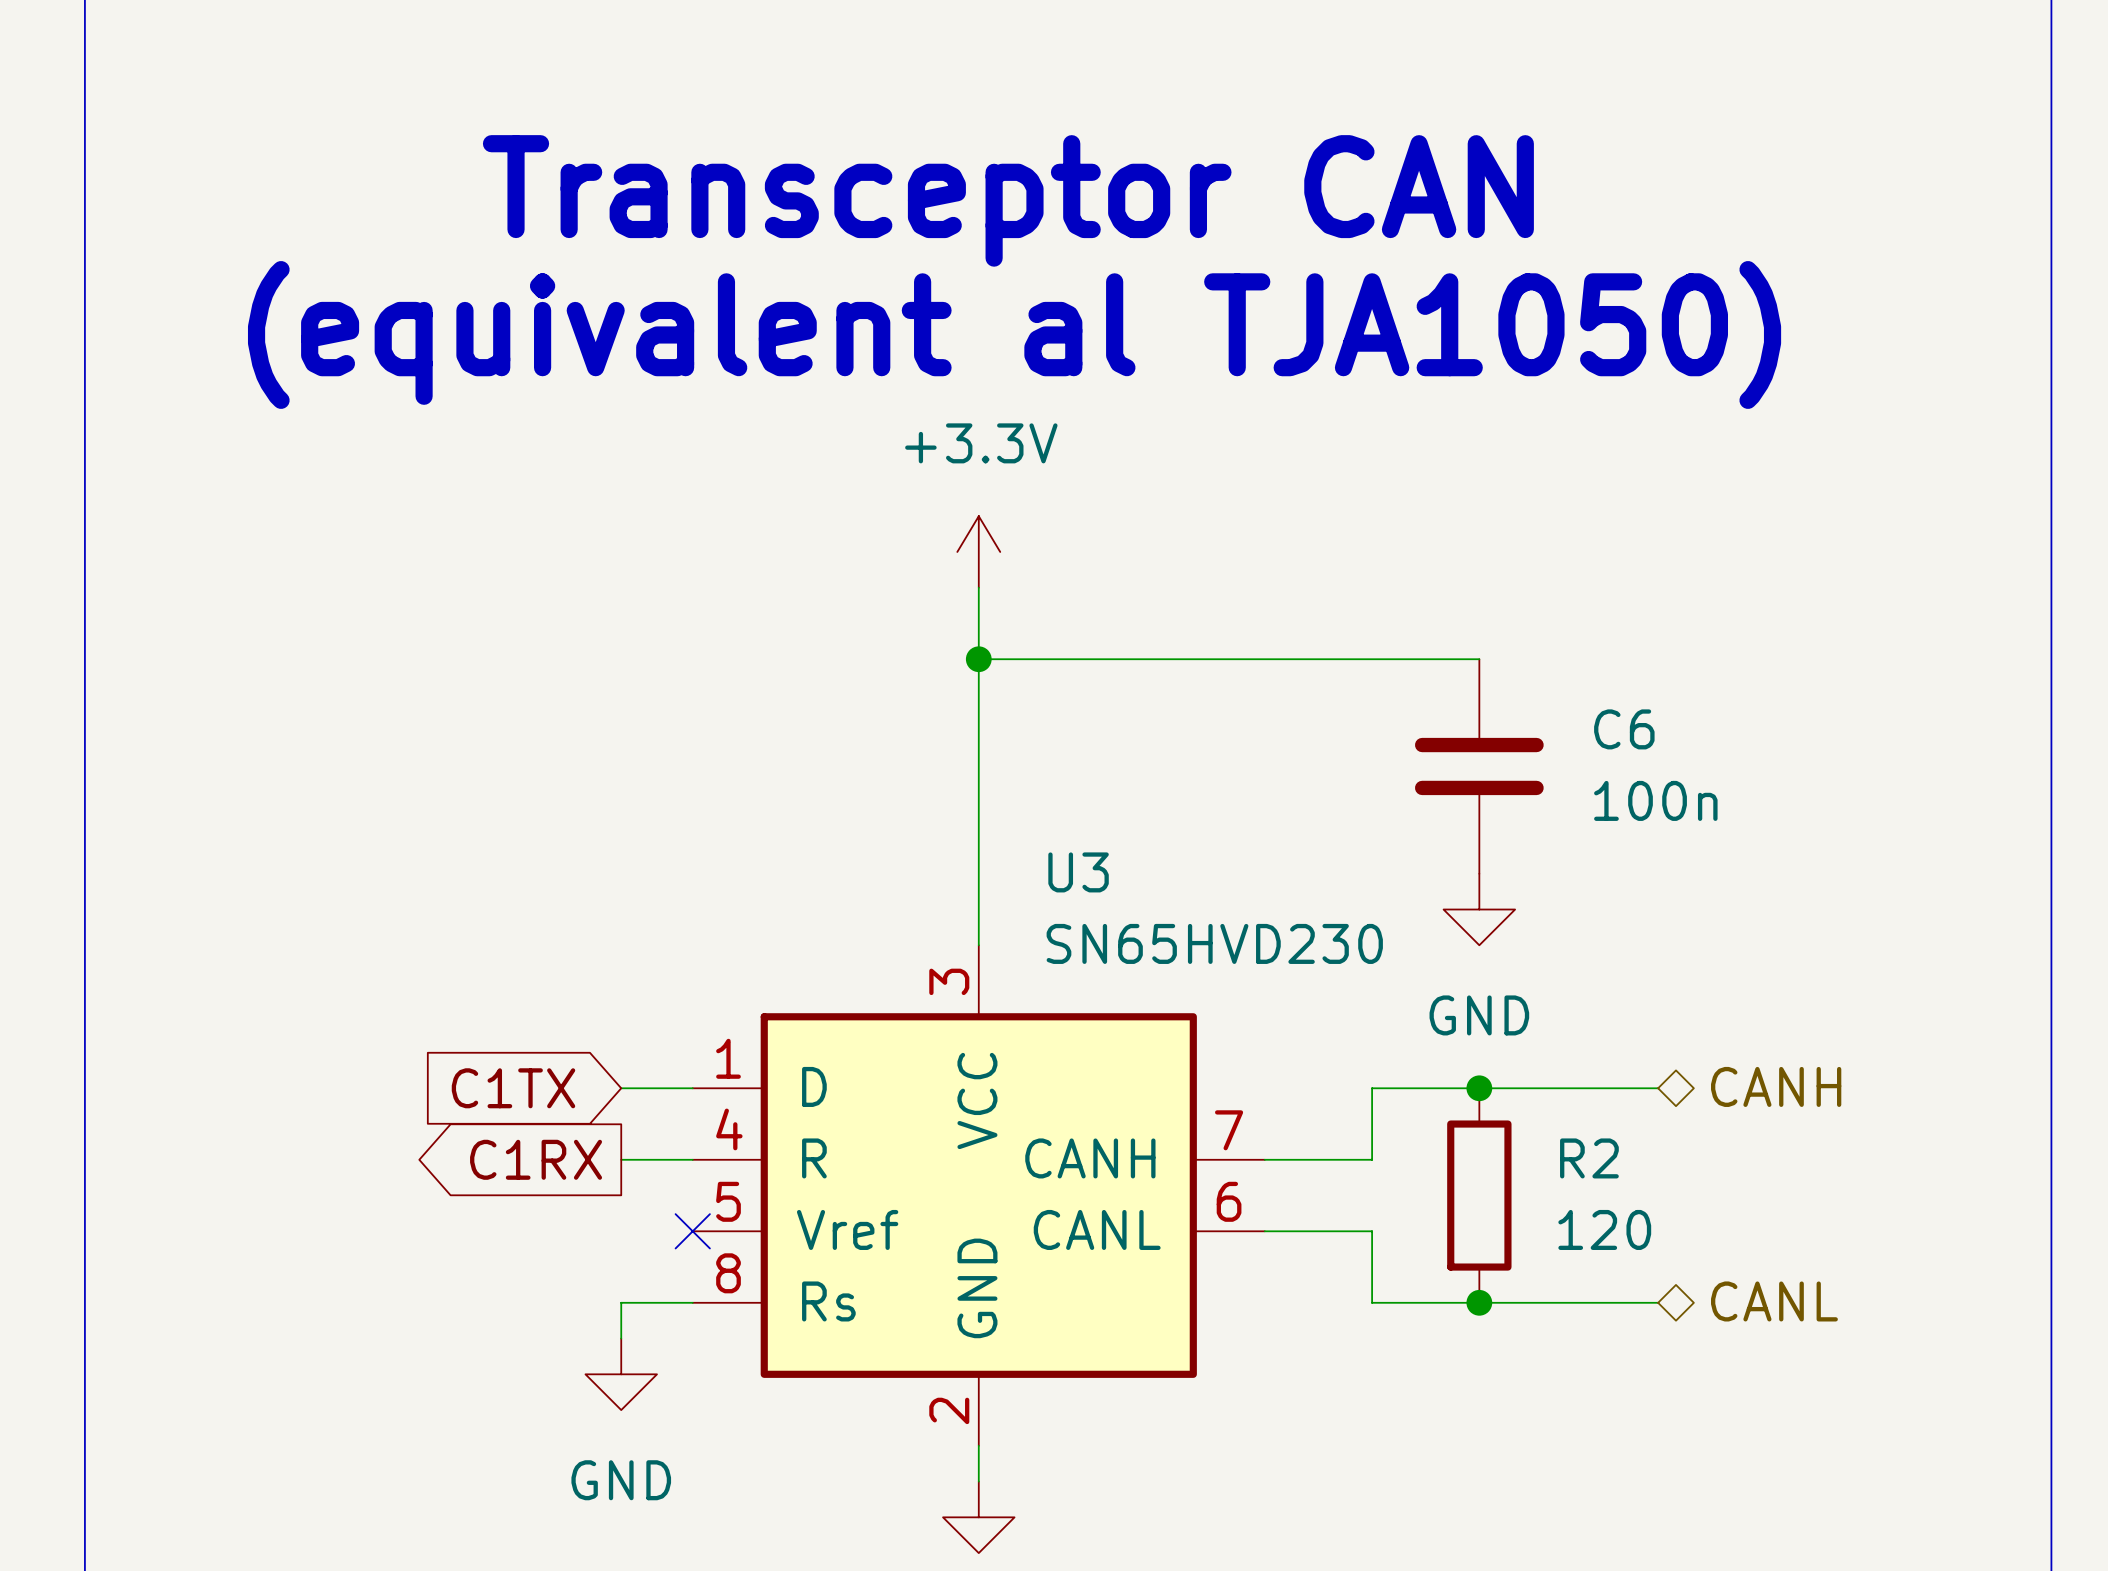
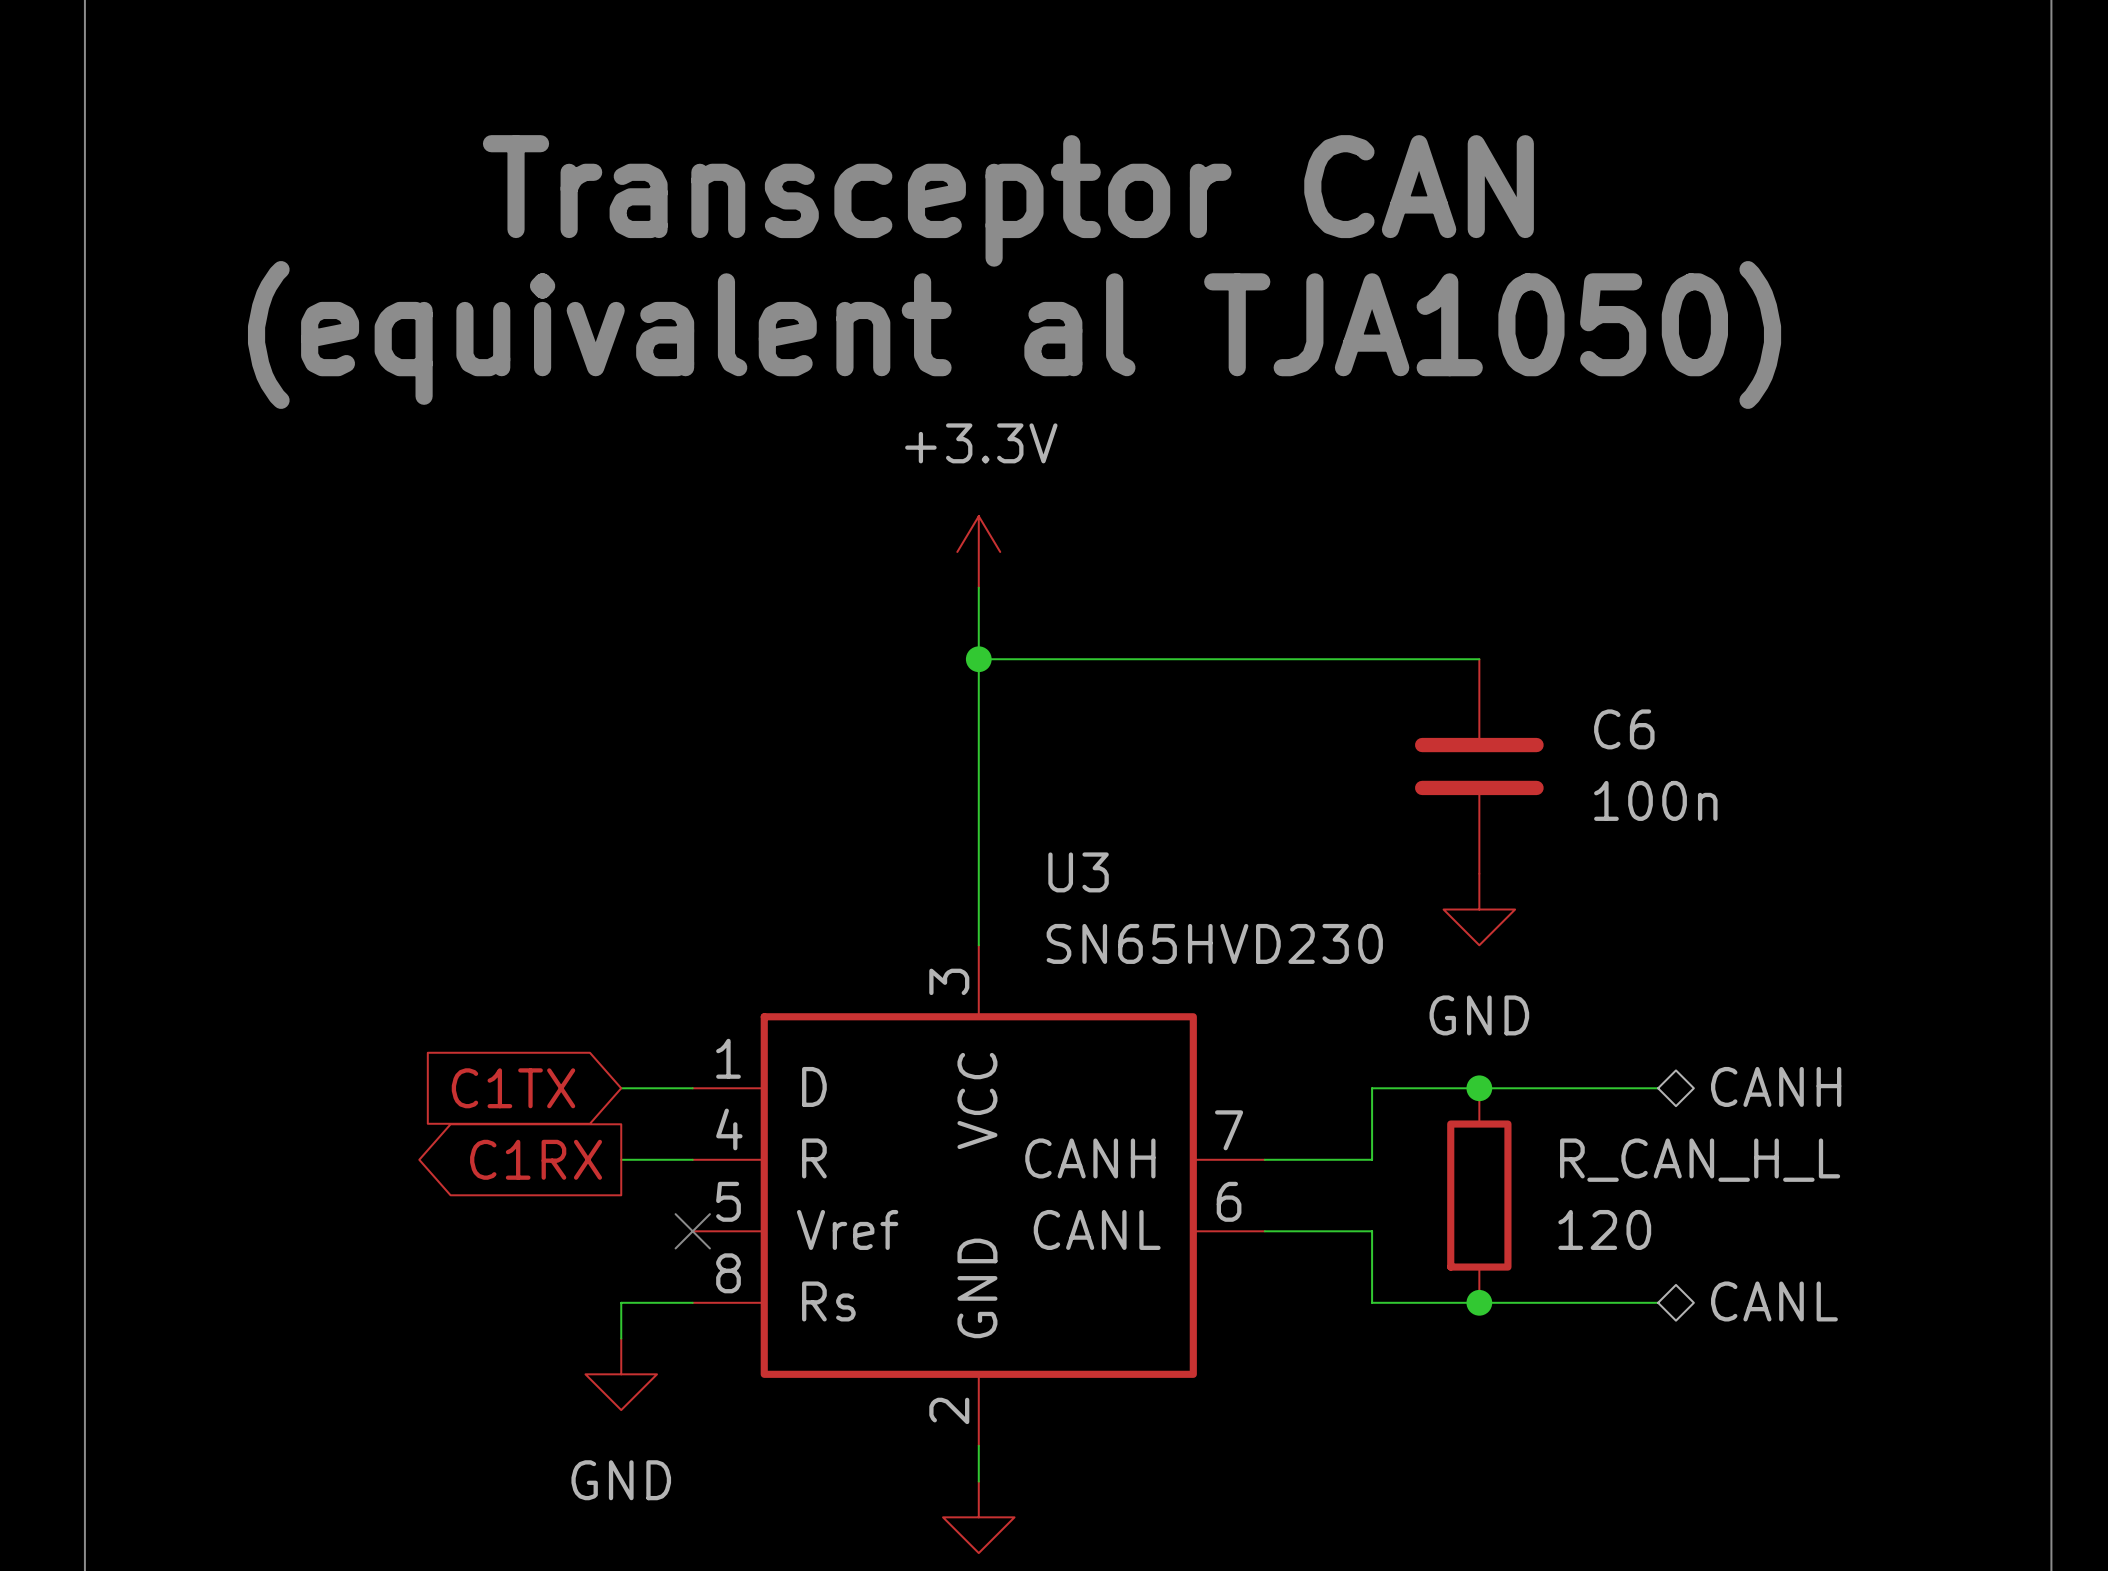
R2 name: R2 (1589, 1158) -> R_CAN_H_L (1700, 1160)

